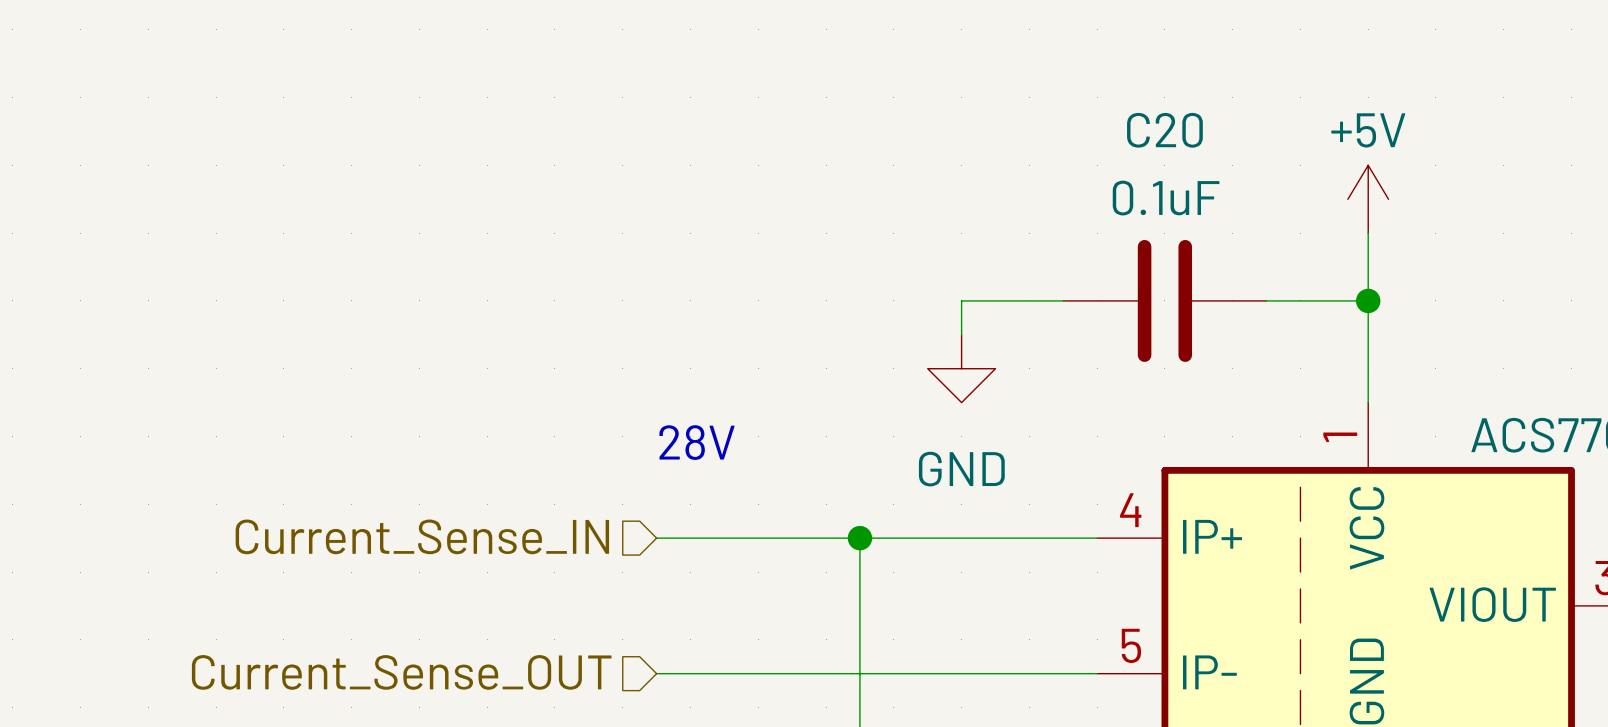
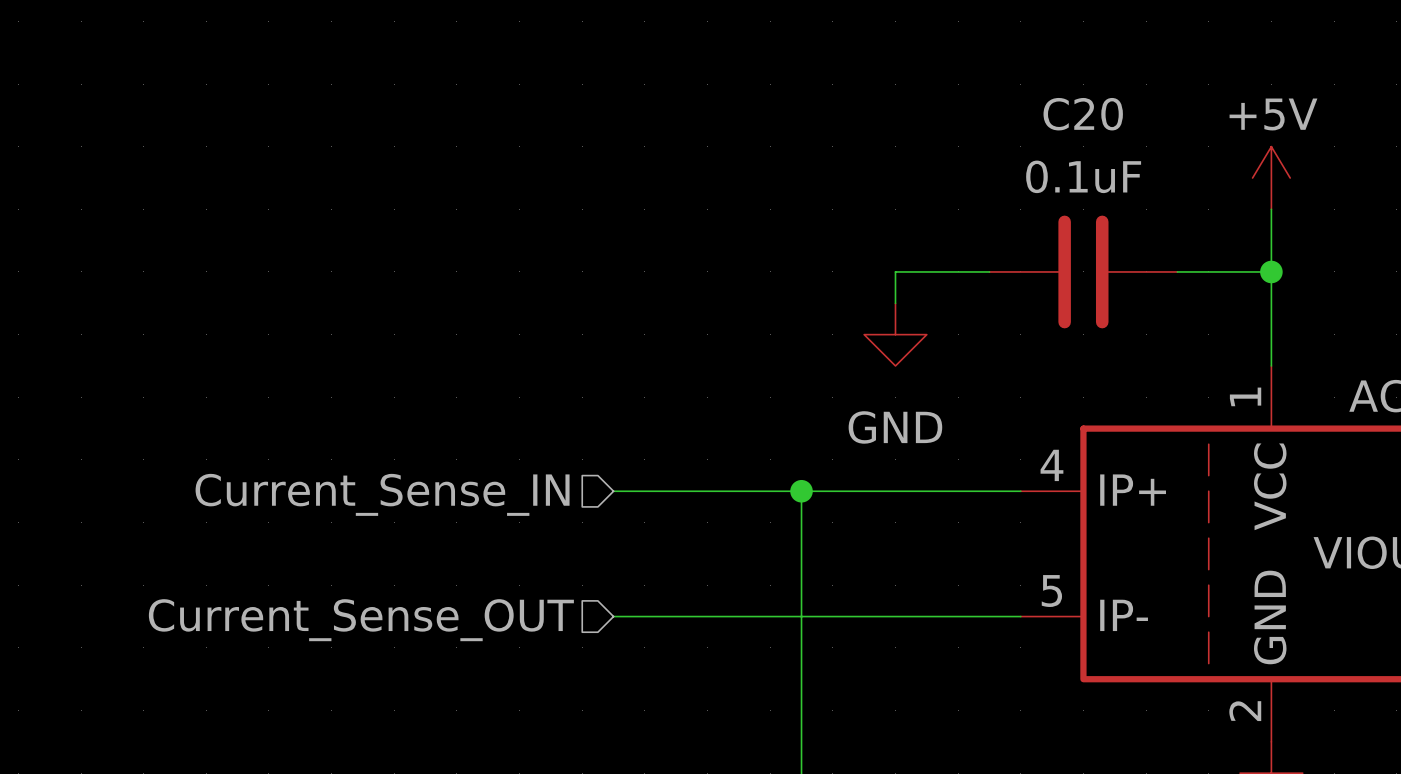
text: 28V (697, 442) -> none

